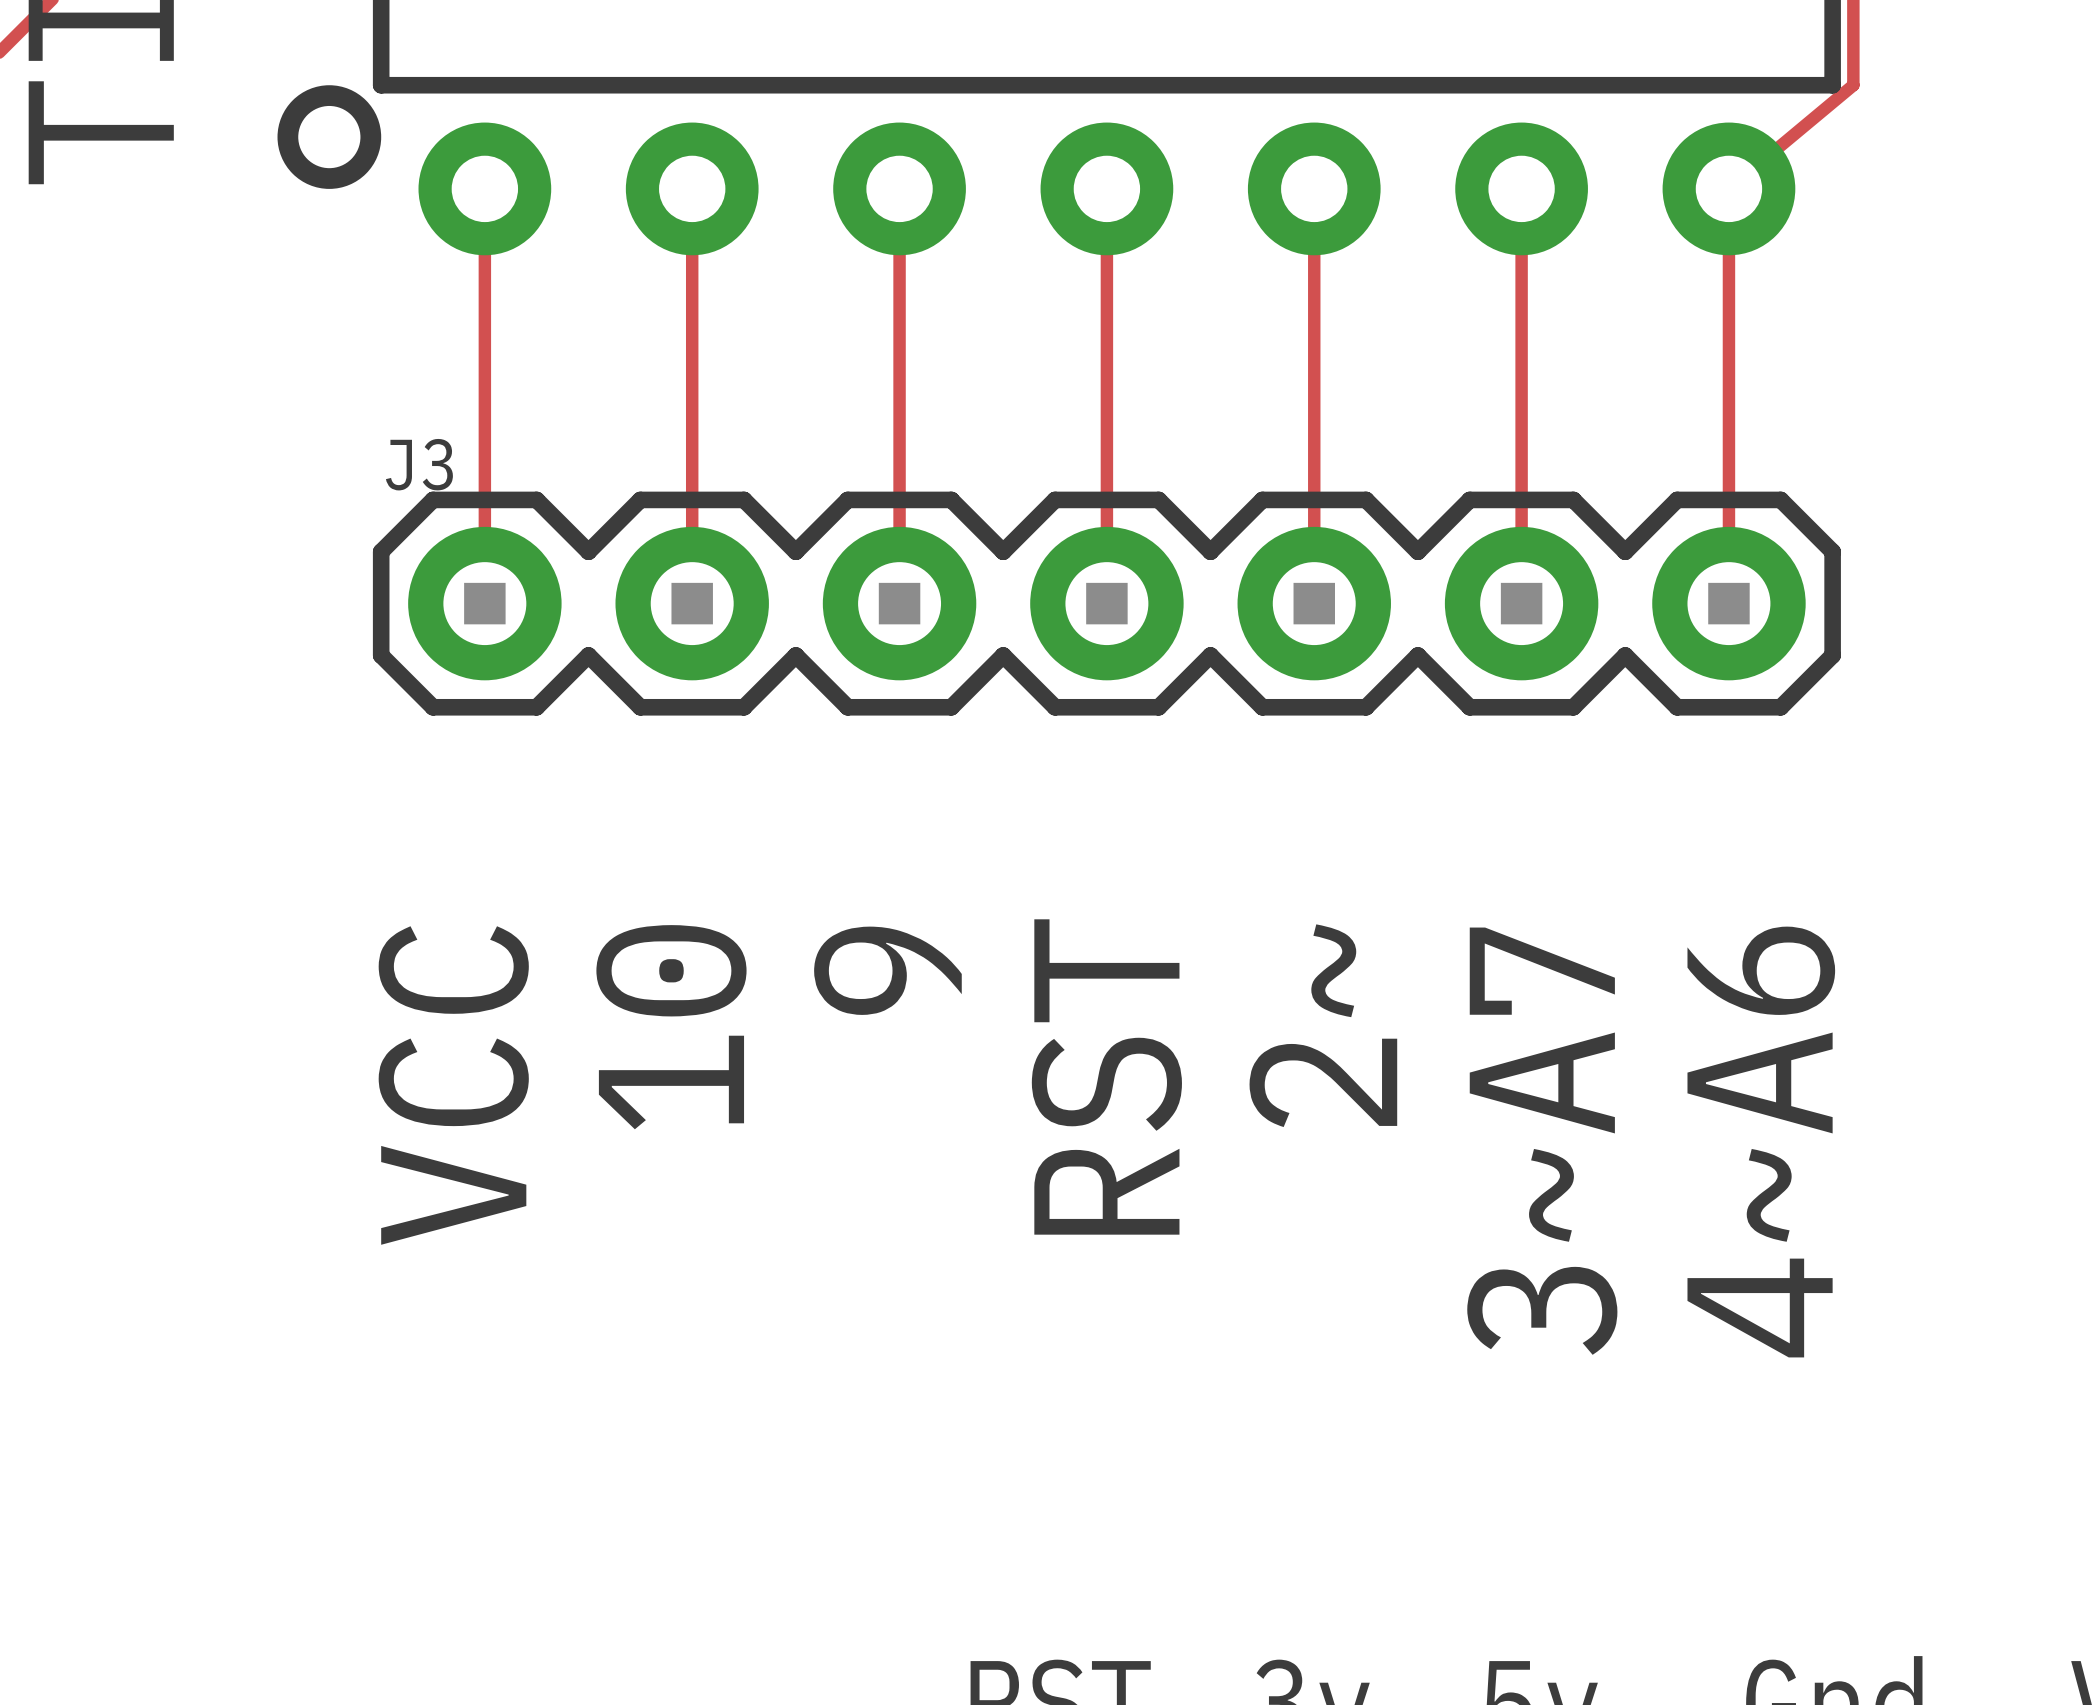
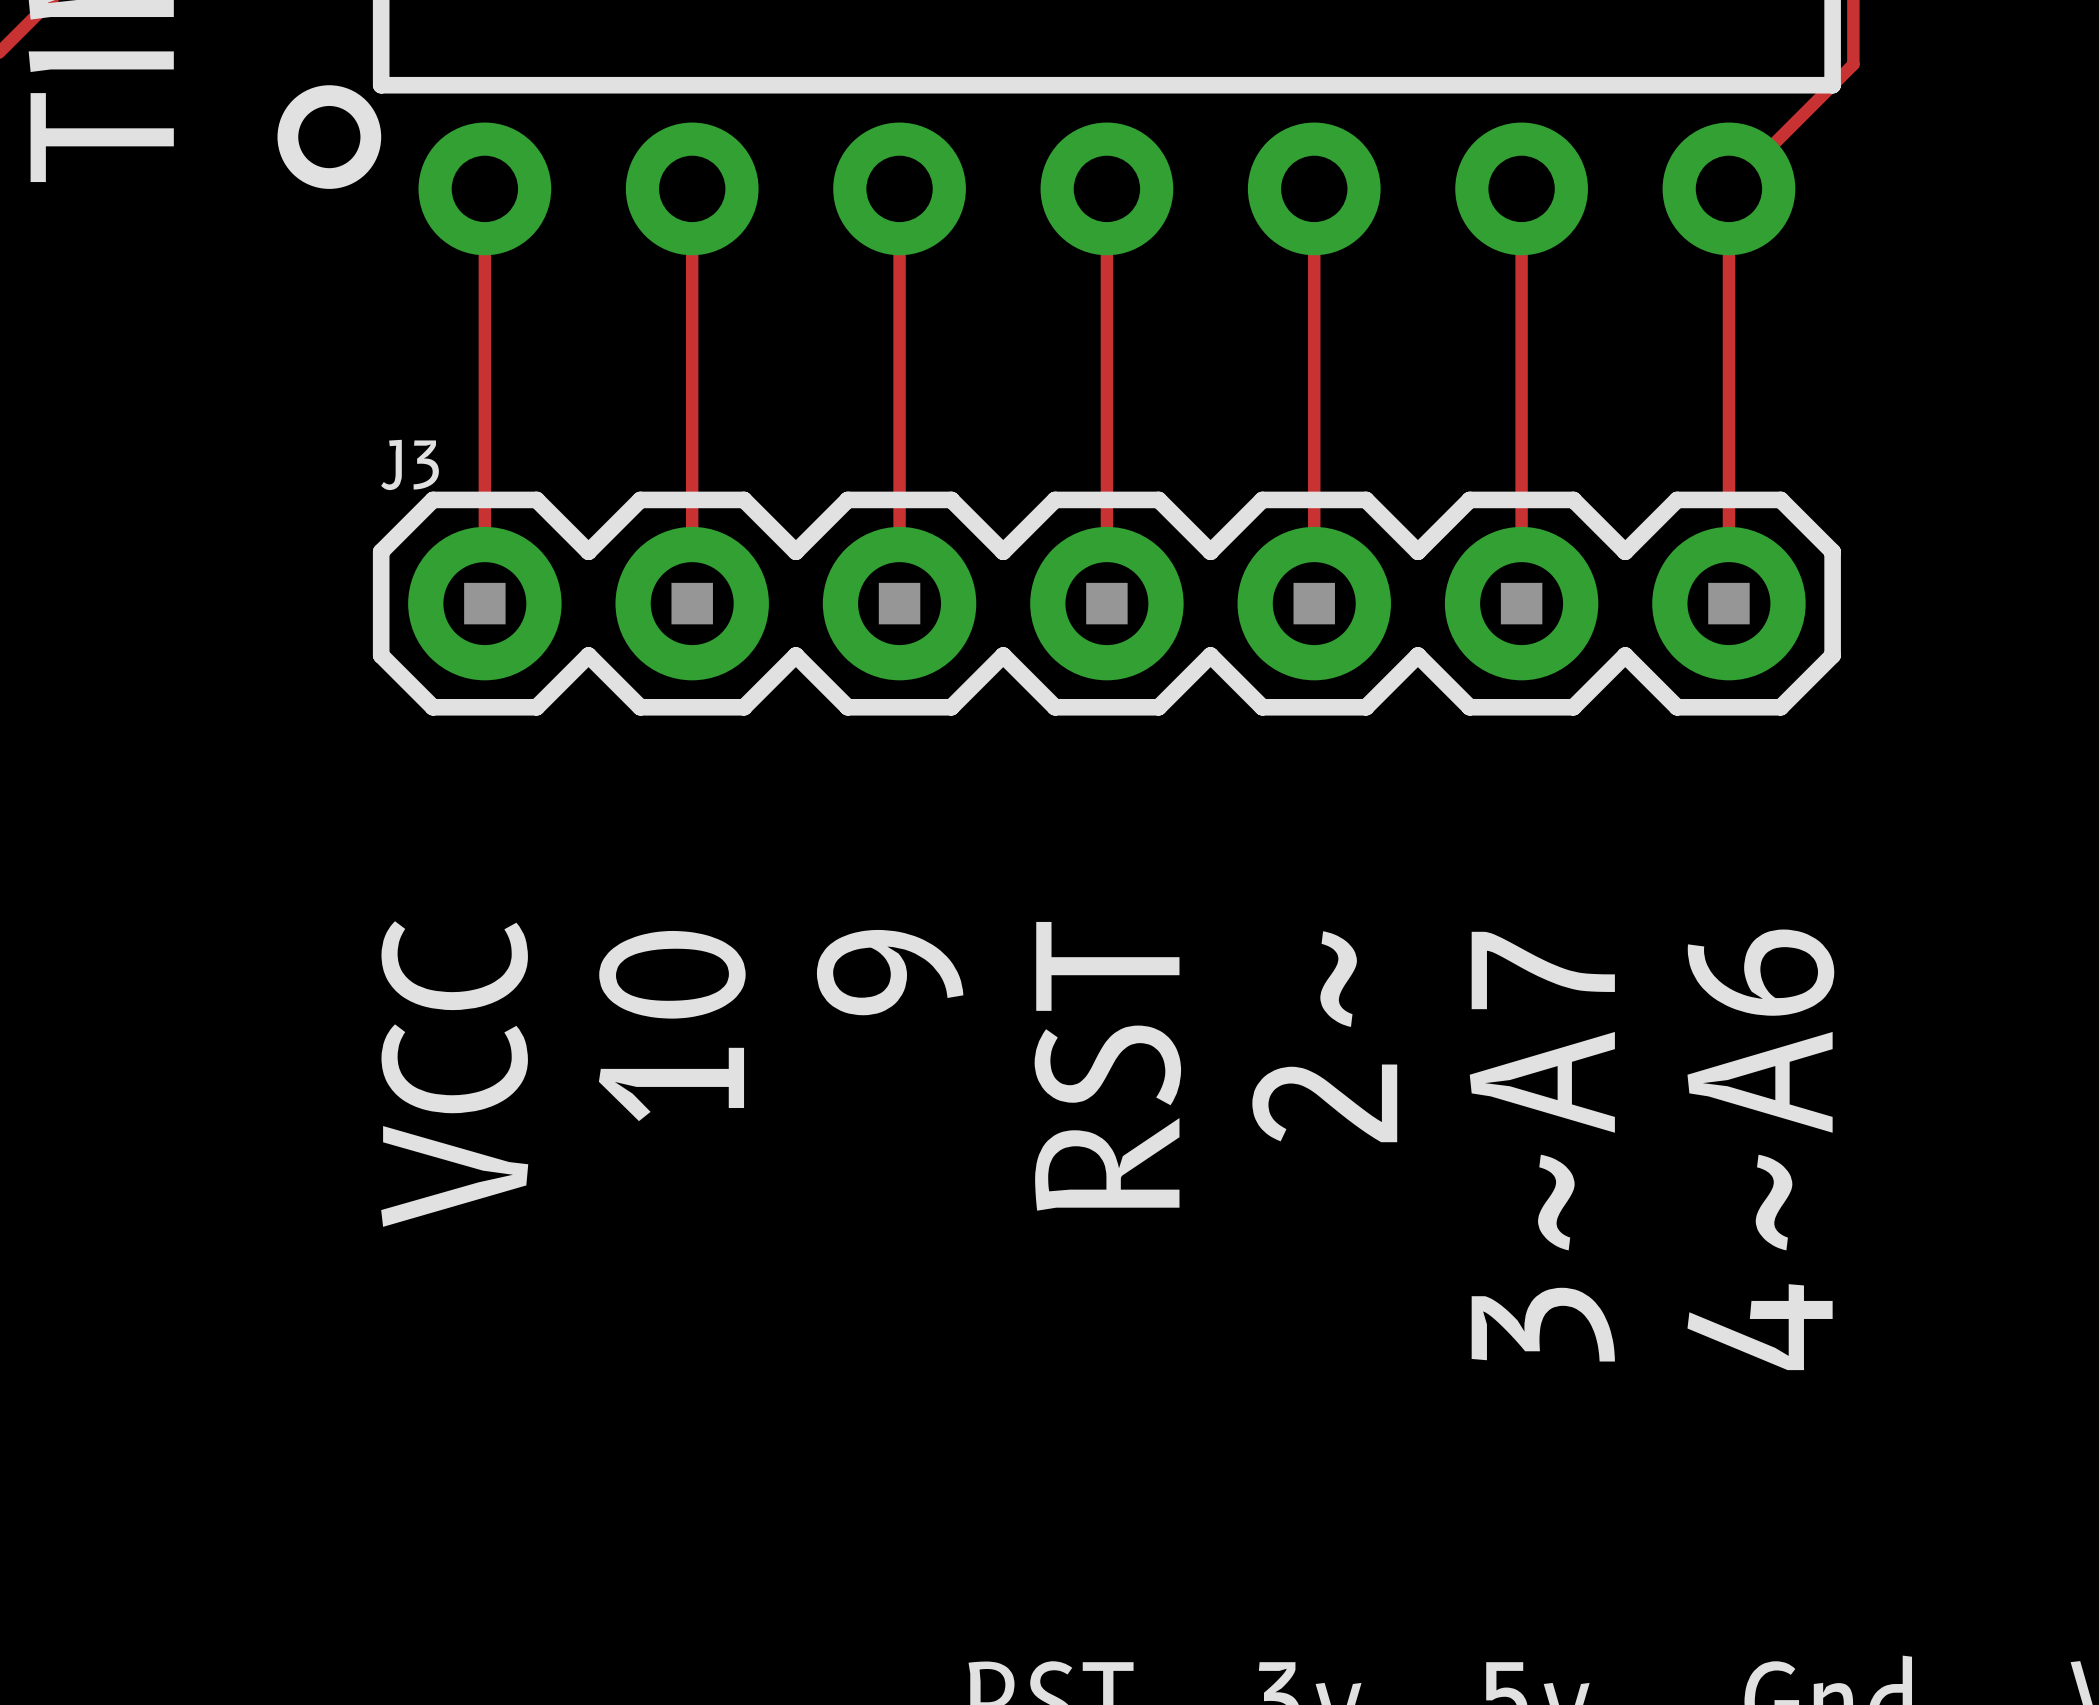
track: (1853, 64) (1853, 85) (1728, 188) -> (1853, 64) (1728, 188)

